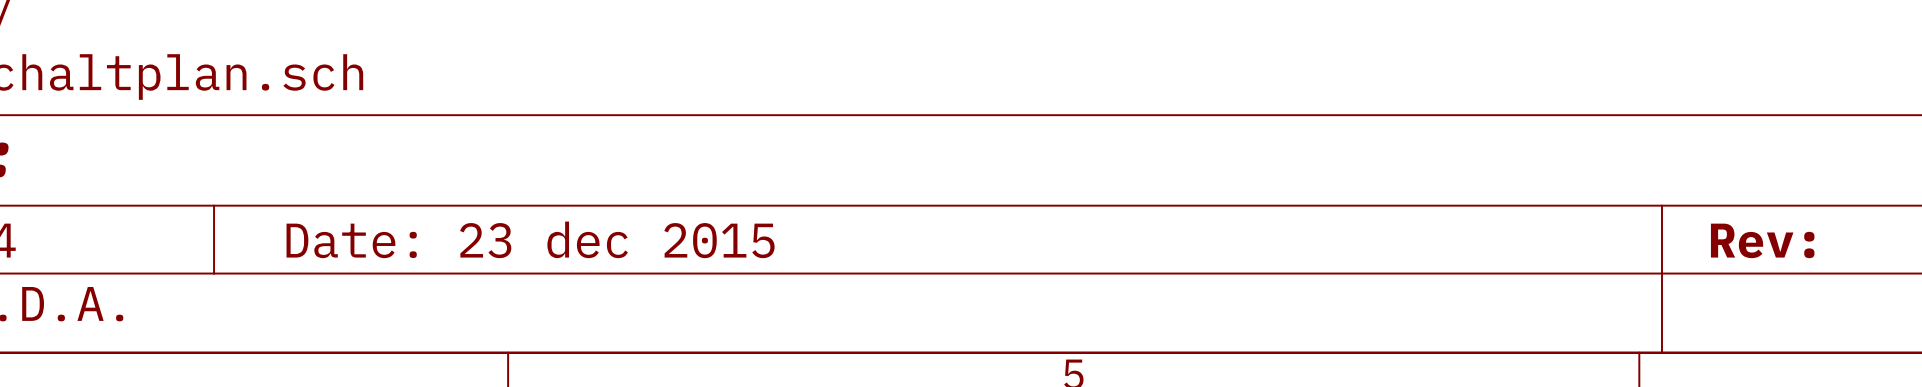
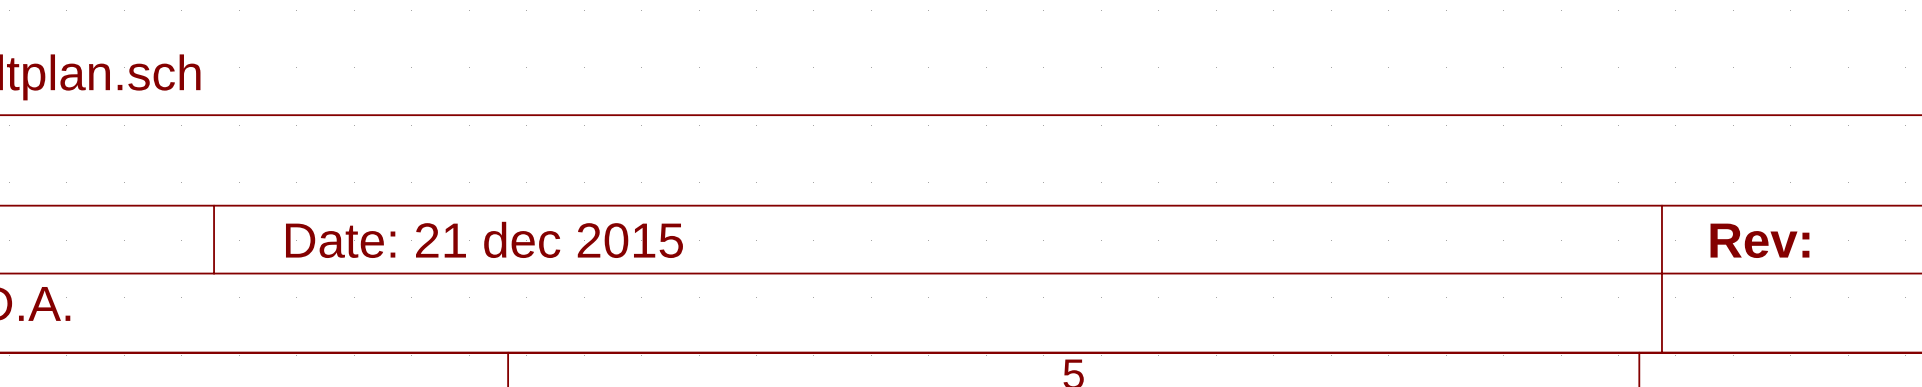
title block: Date: 23 dec 2015 (530, 239) -> Date: 21 dec 2015 (484, 239)

